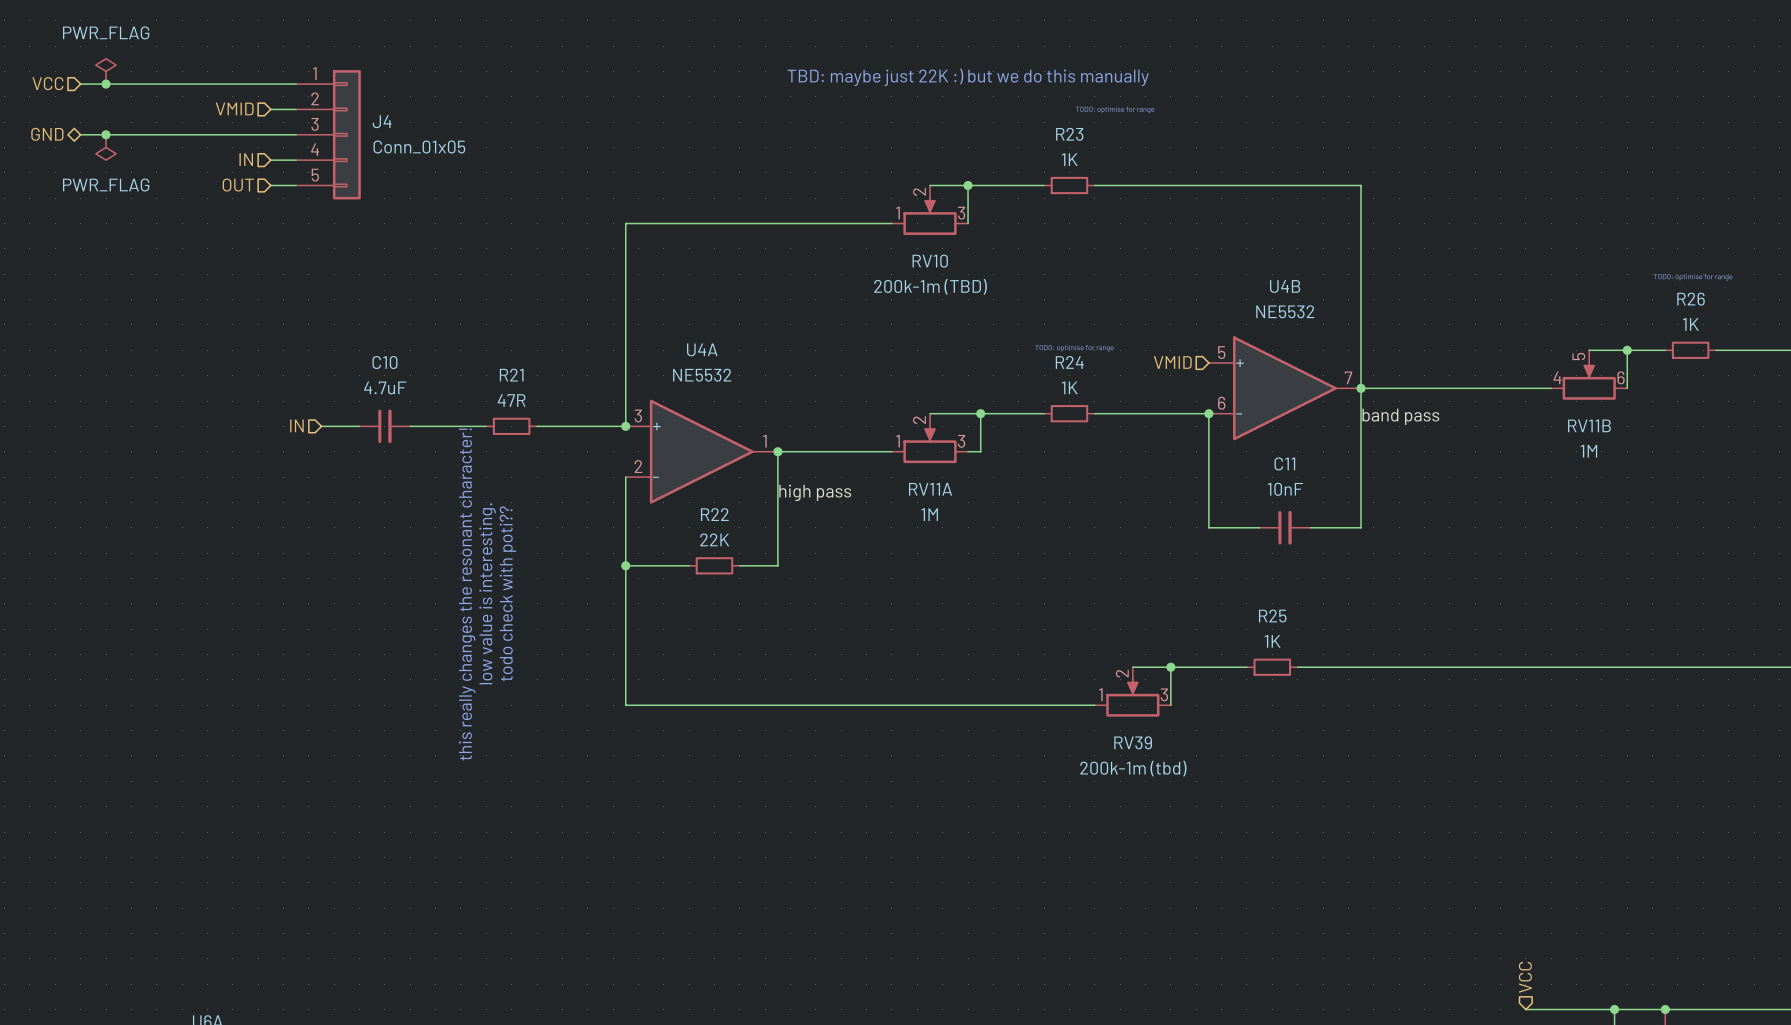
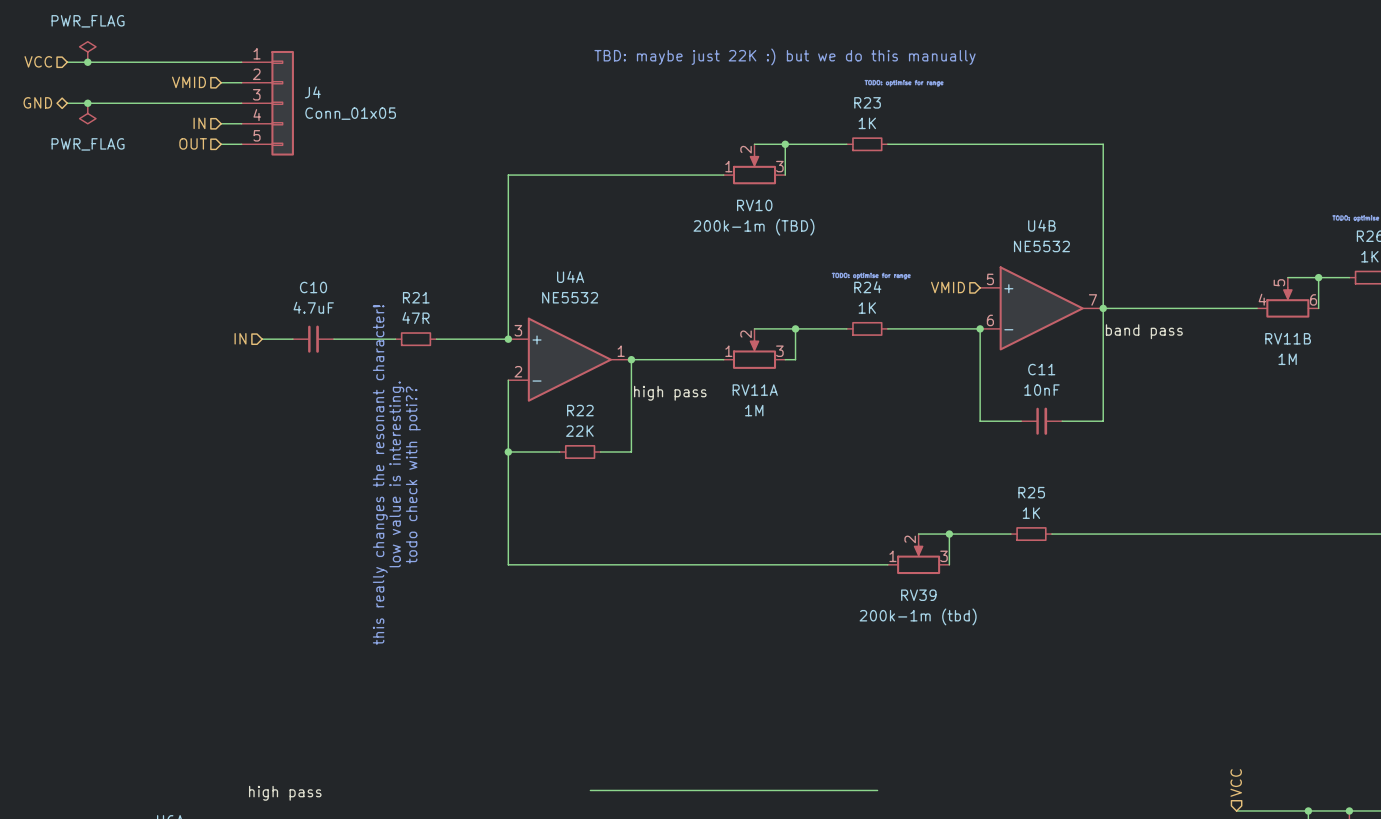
wire: none -> (590, 790) (877, 790)
label: none -> high pass (285, 793)

